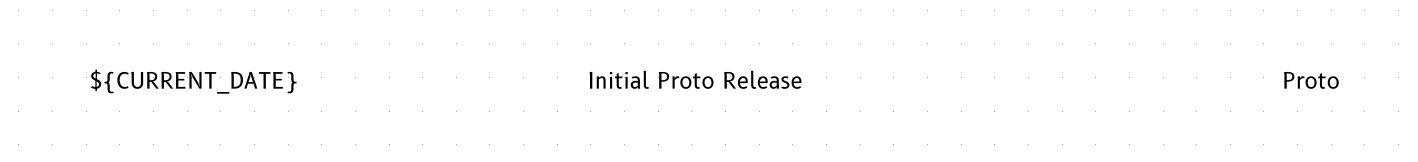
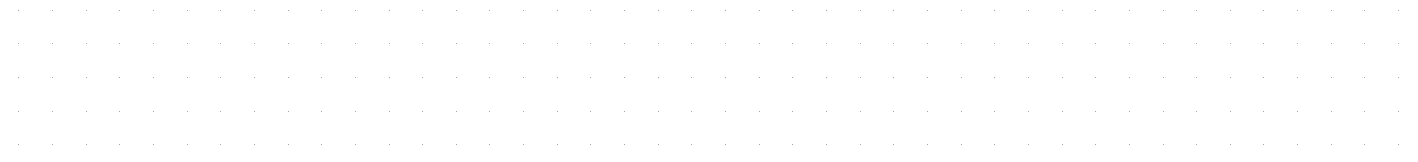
text: Initial Proto Release (695, 79) -> none
text: Proto (1311, 80) -> none
text: ${CURRENT_DATE} (193, 81) -> none

